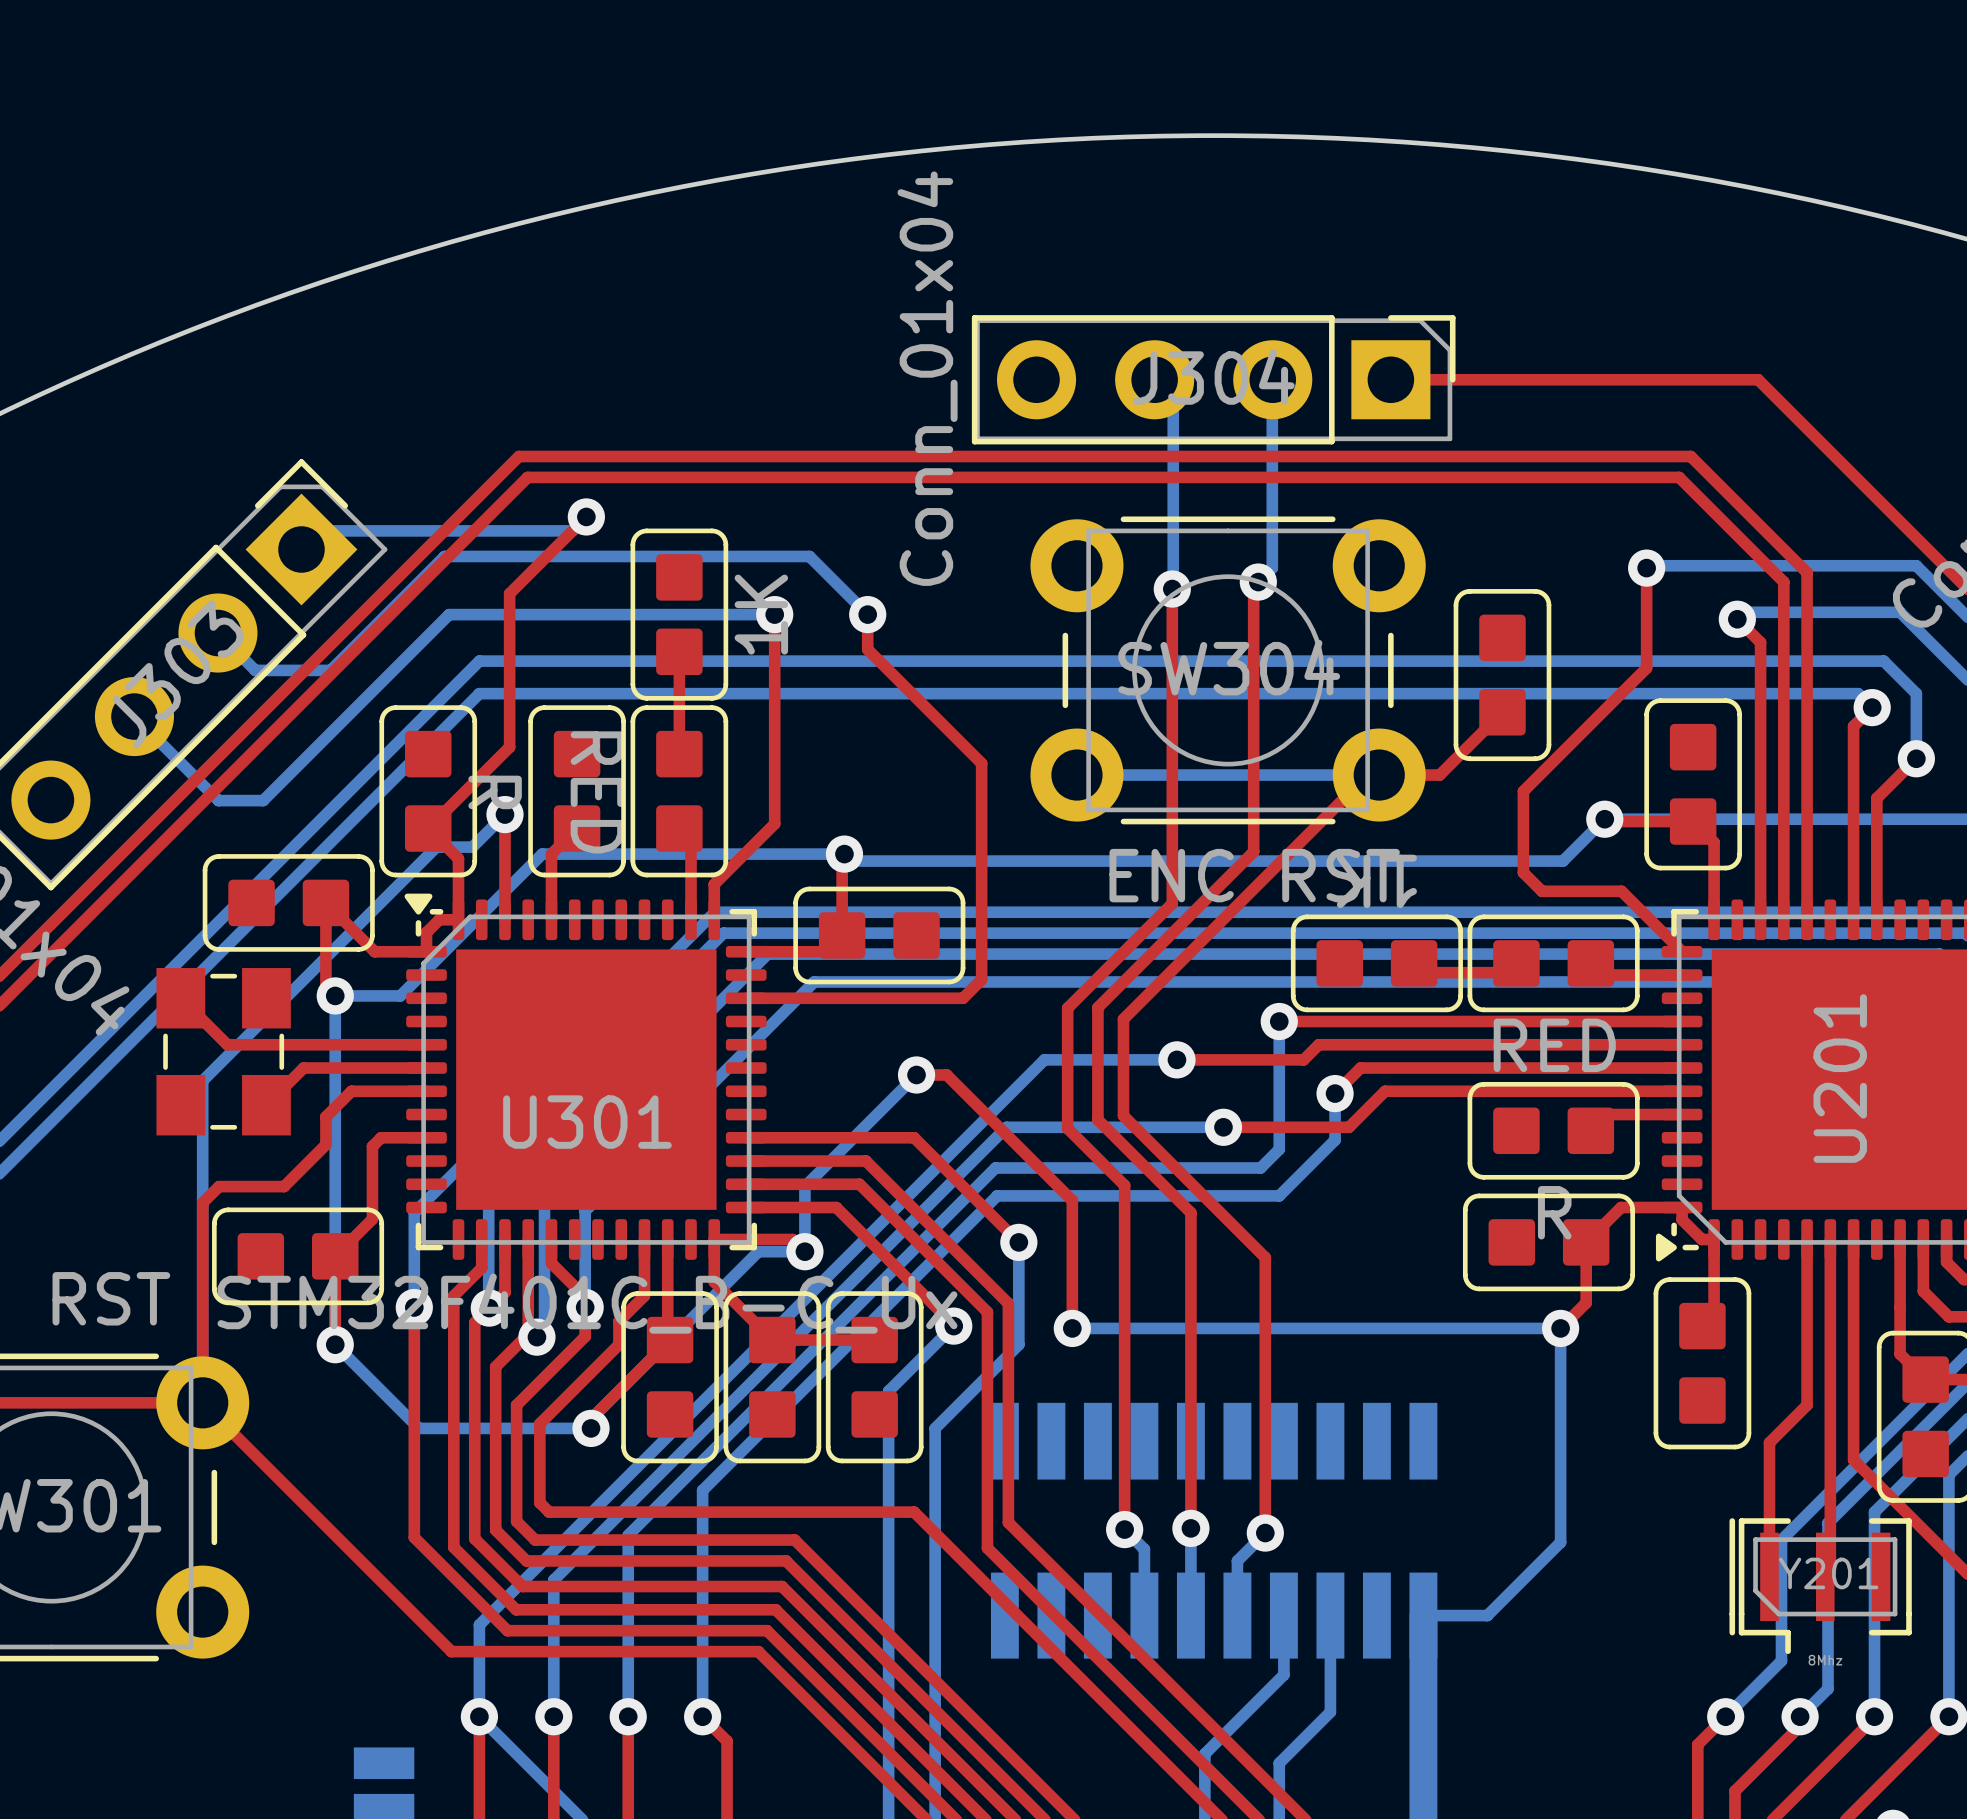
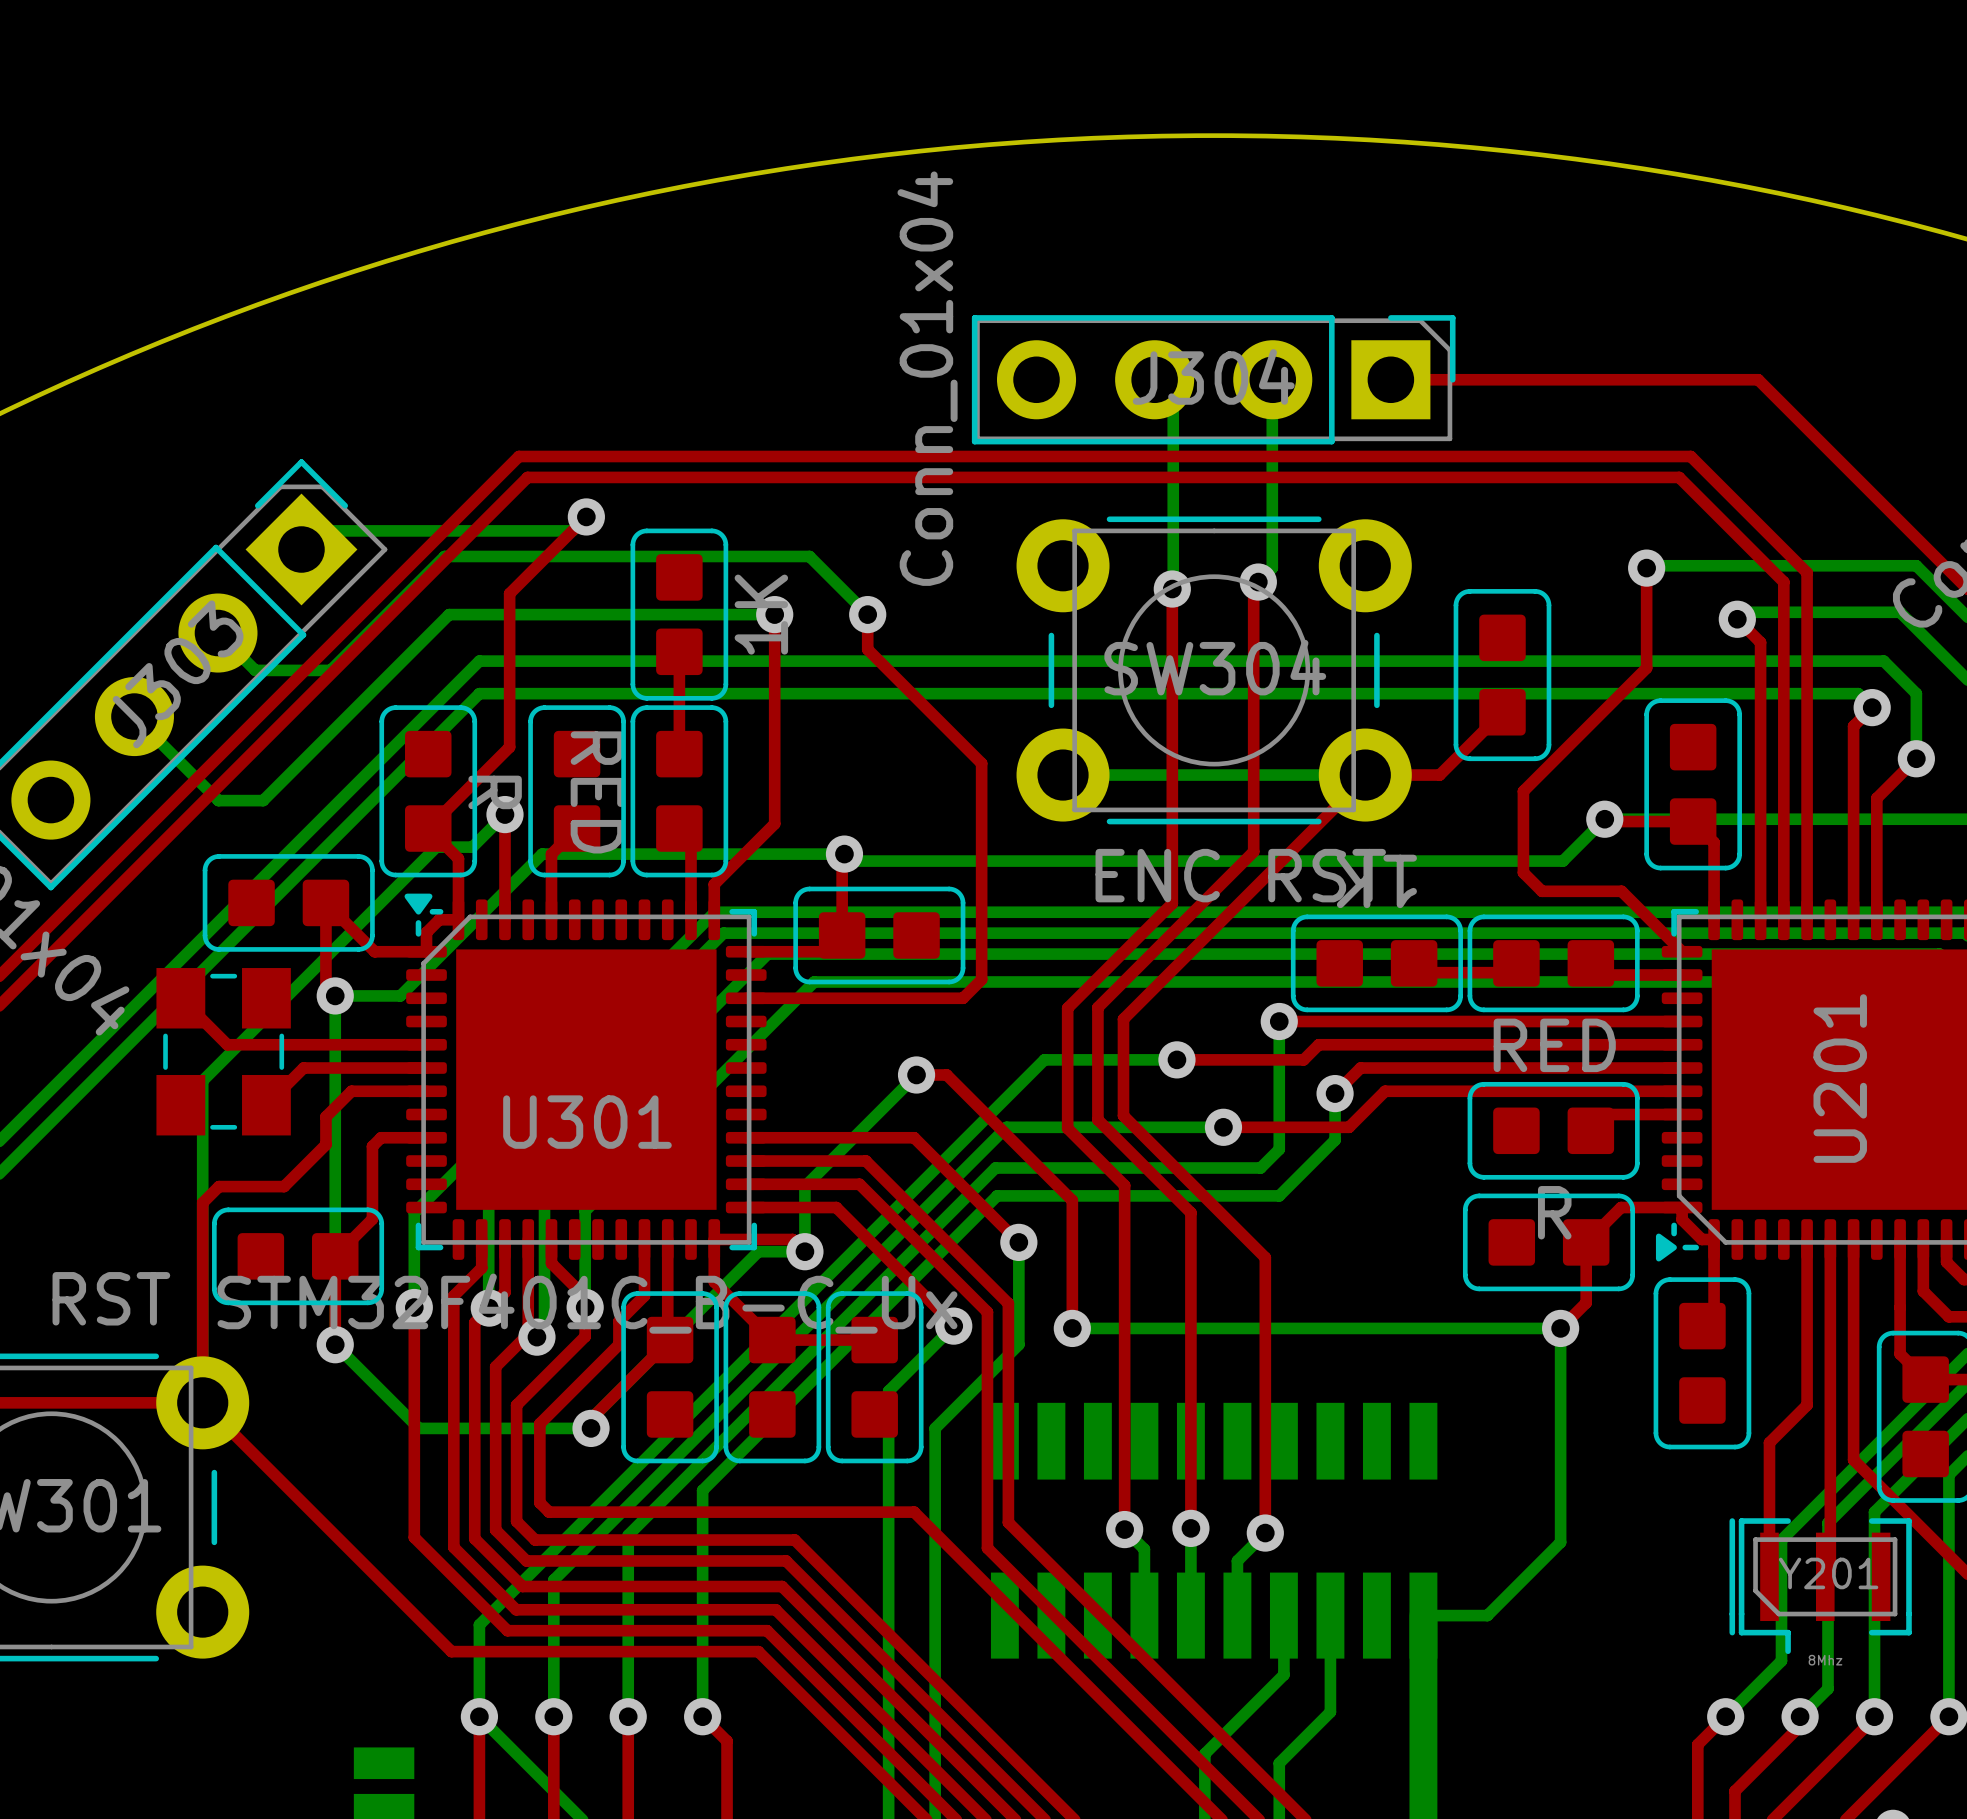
SW304 position: (1228, 670) -> (1214, 670)

